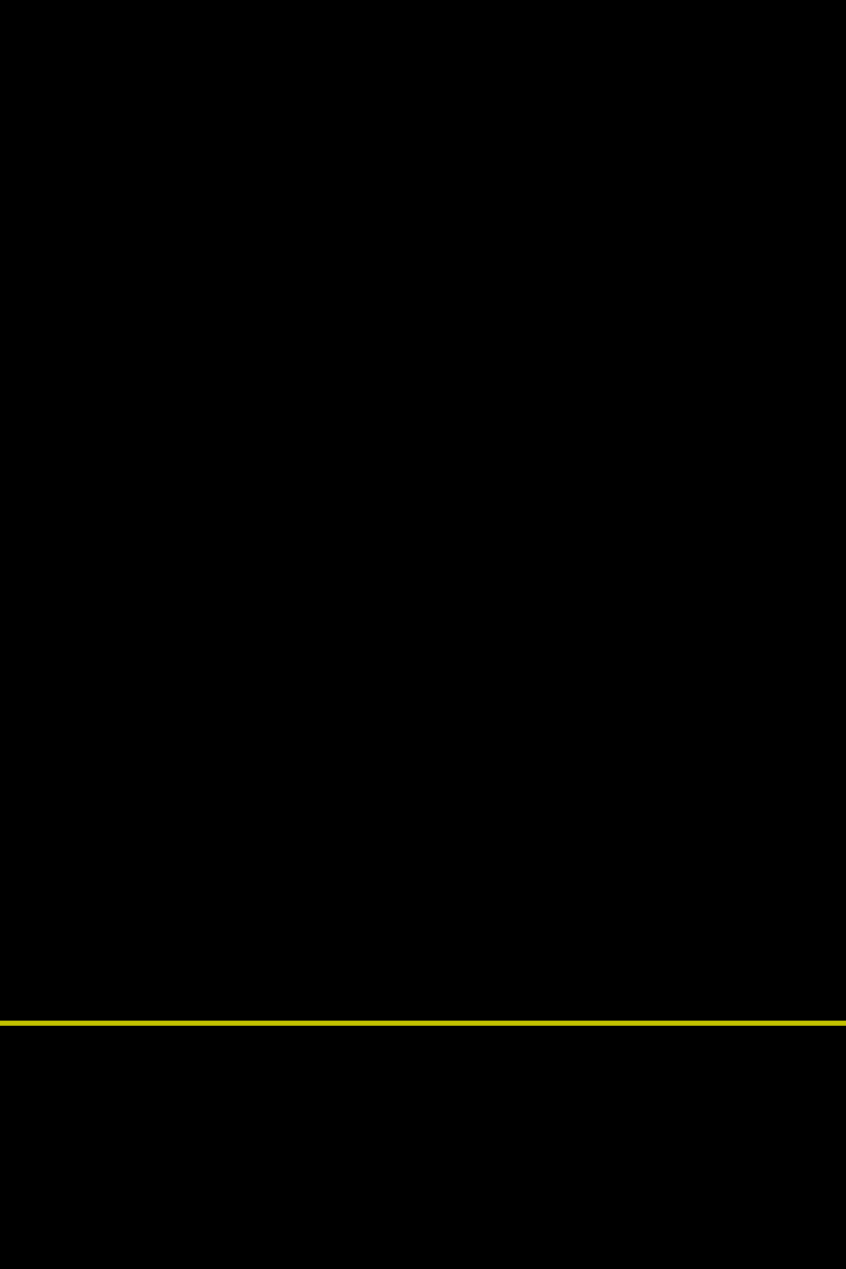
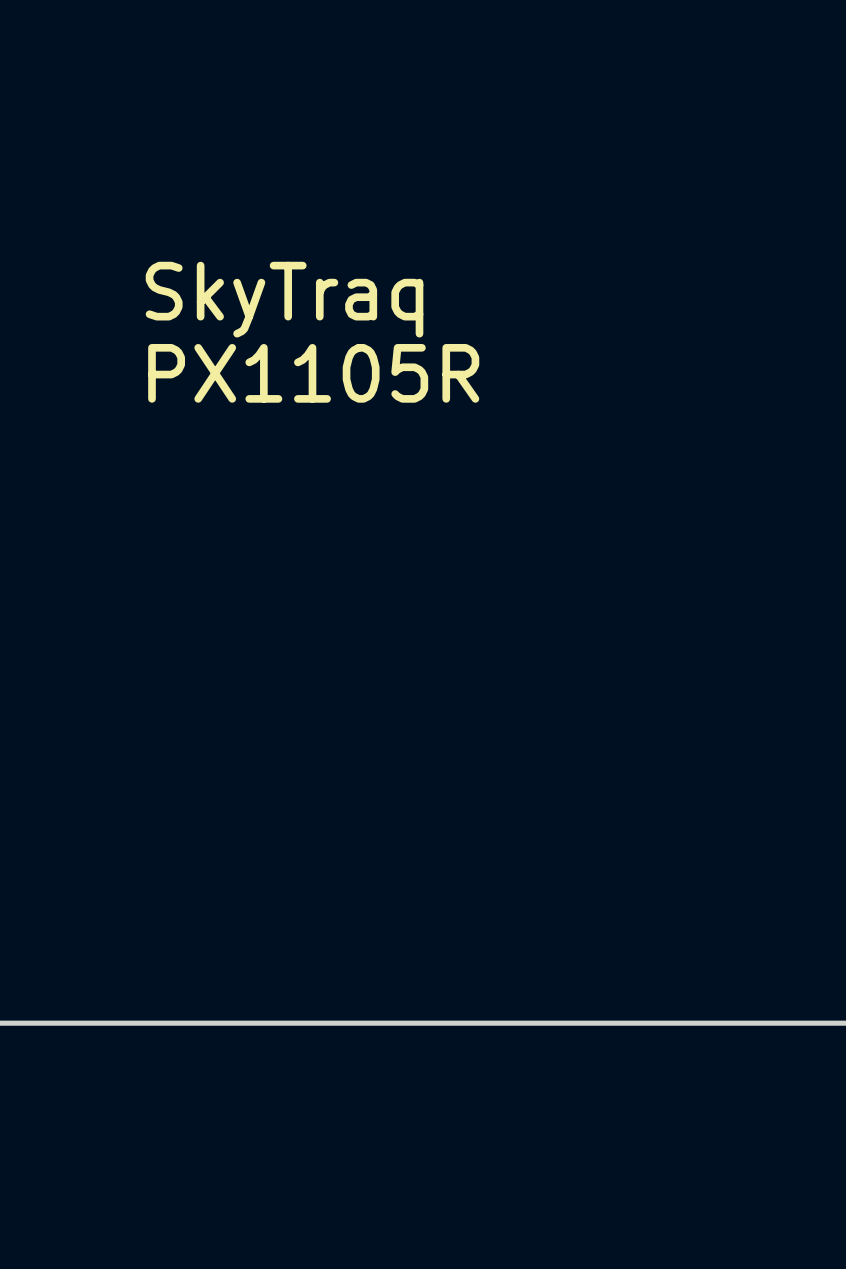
text: none -> SkyTraq (284, 299)
text: none -> PX1105R (313, 373)

